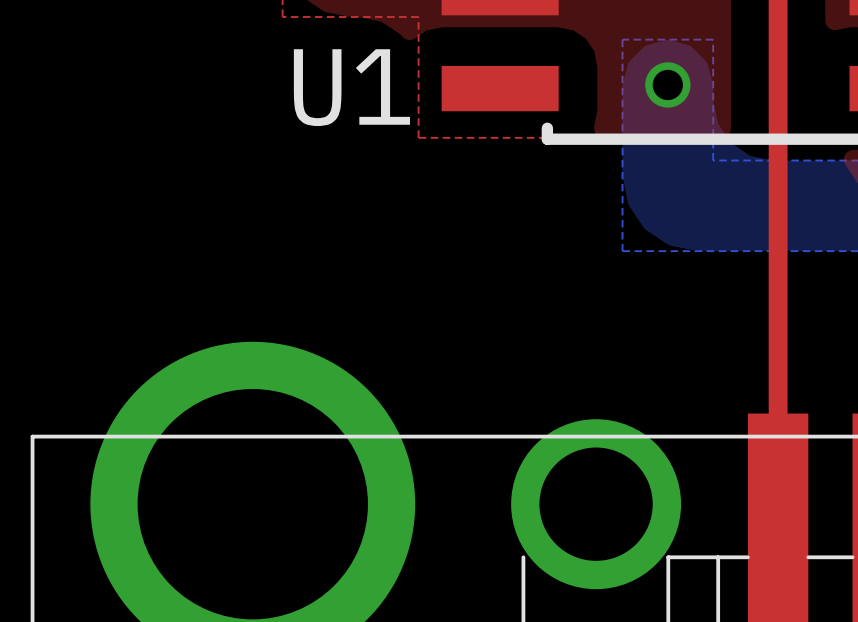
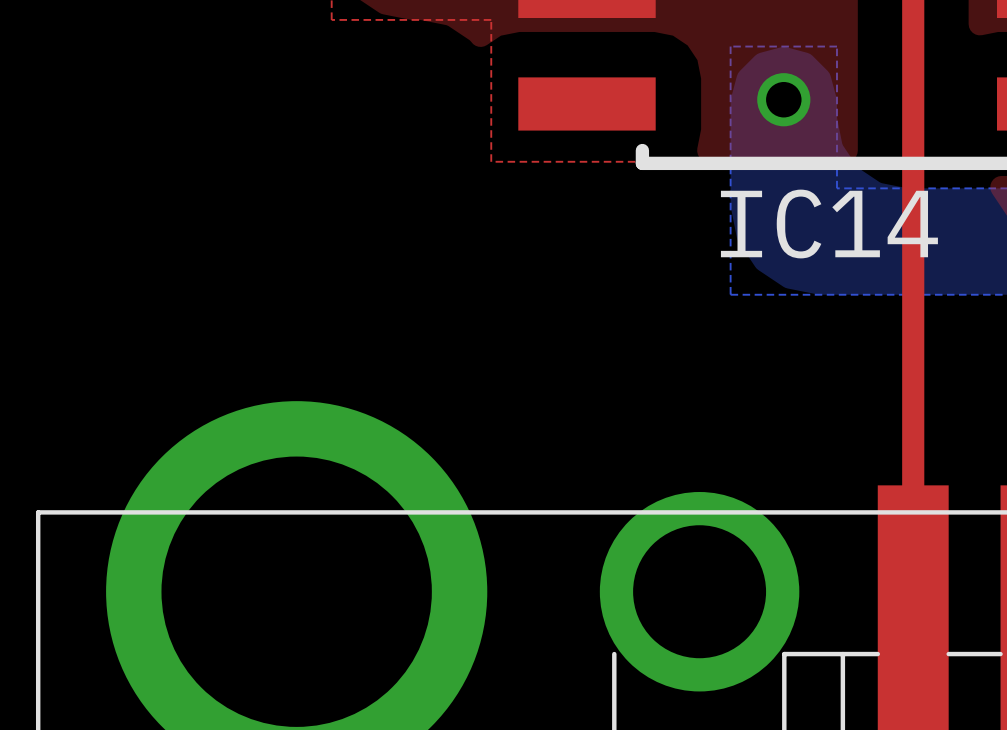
U1 name: U1 (351, 87) -> IC14 (829, 224)

